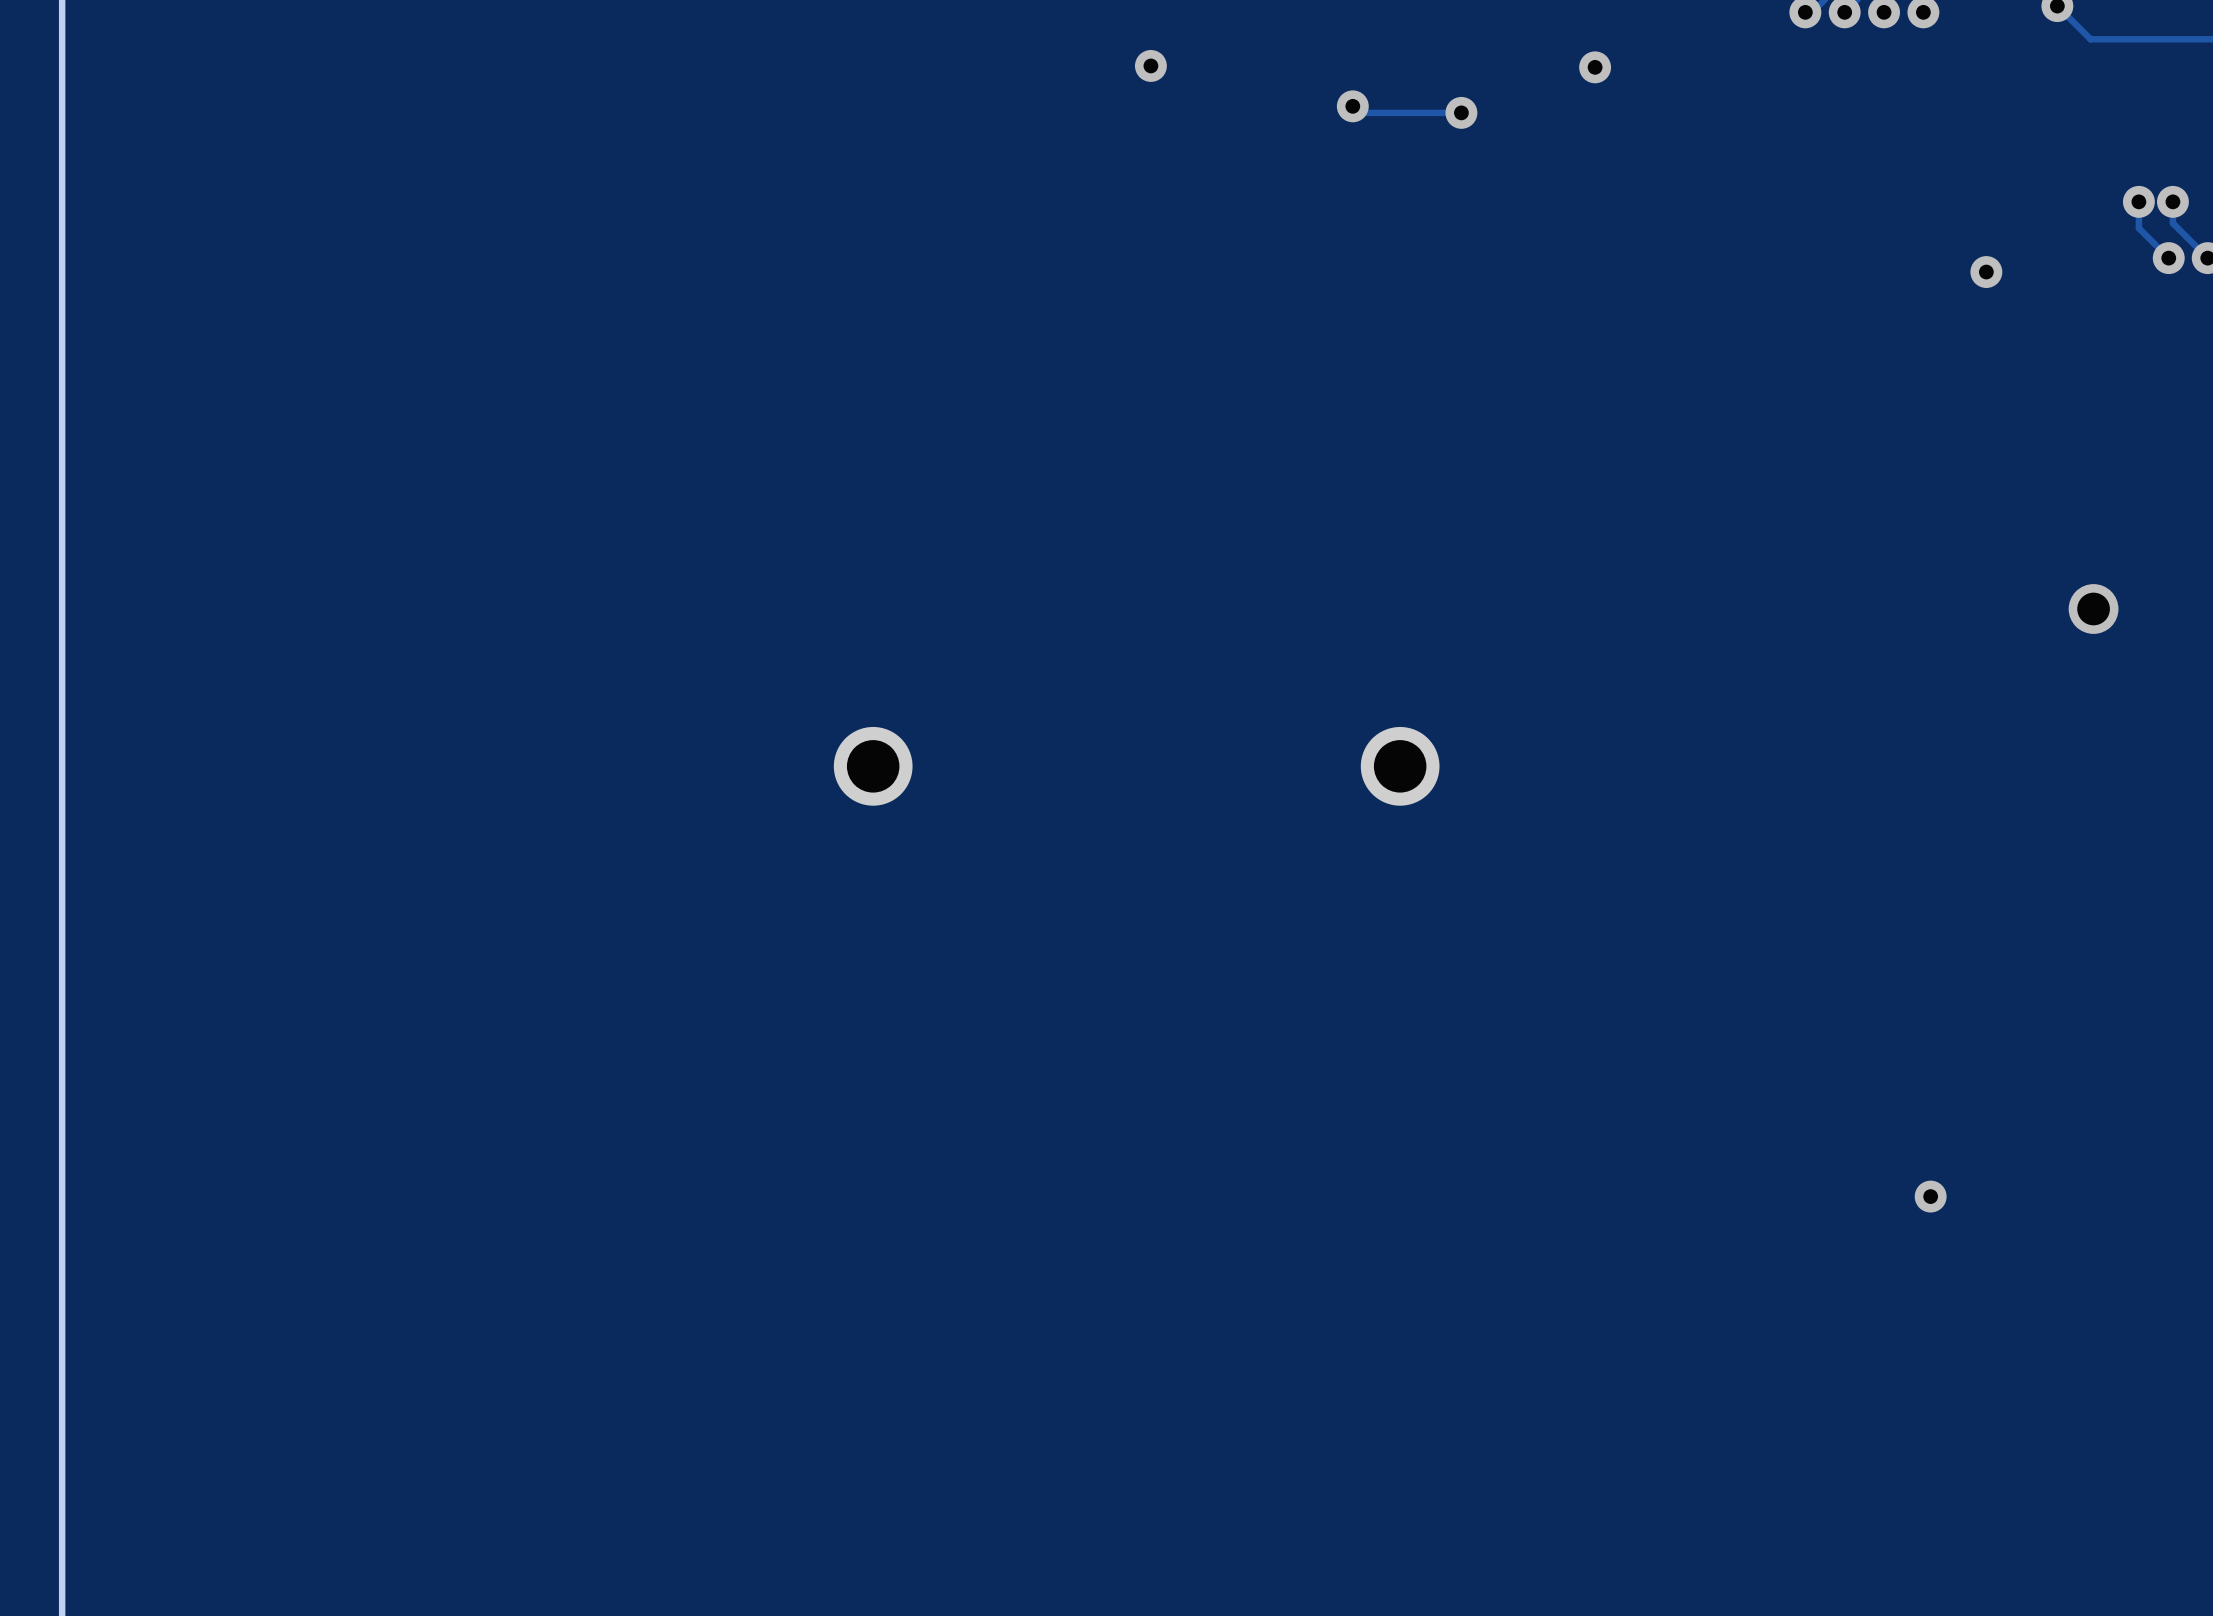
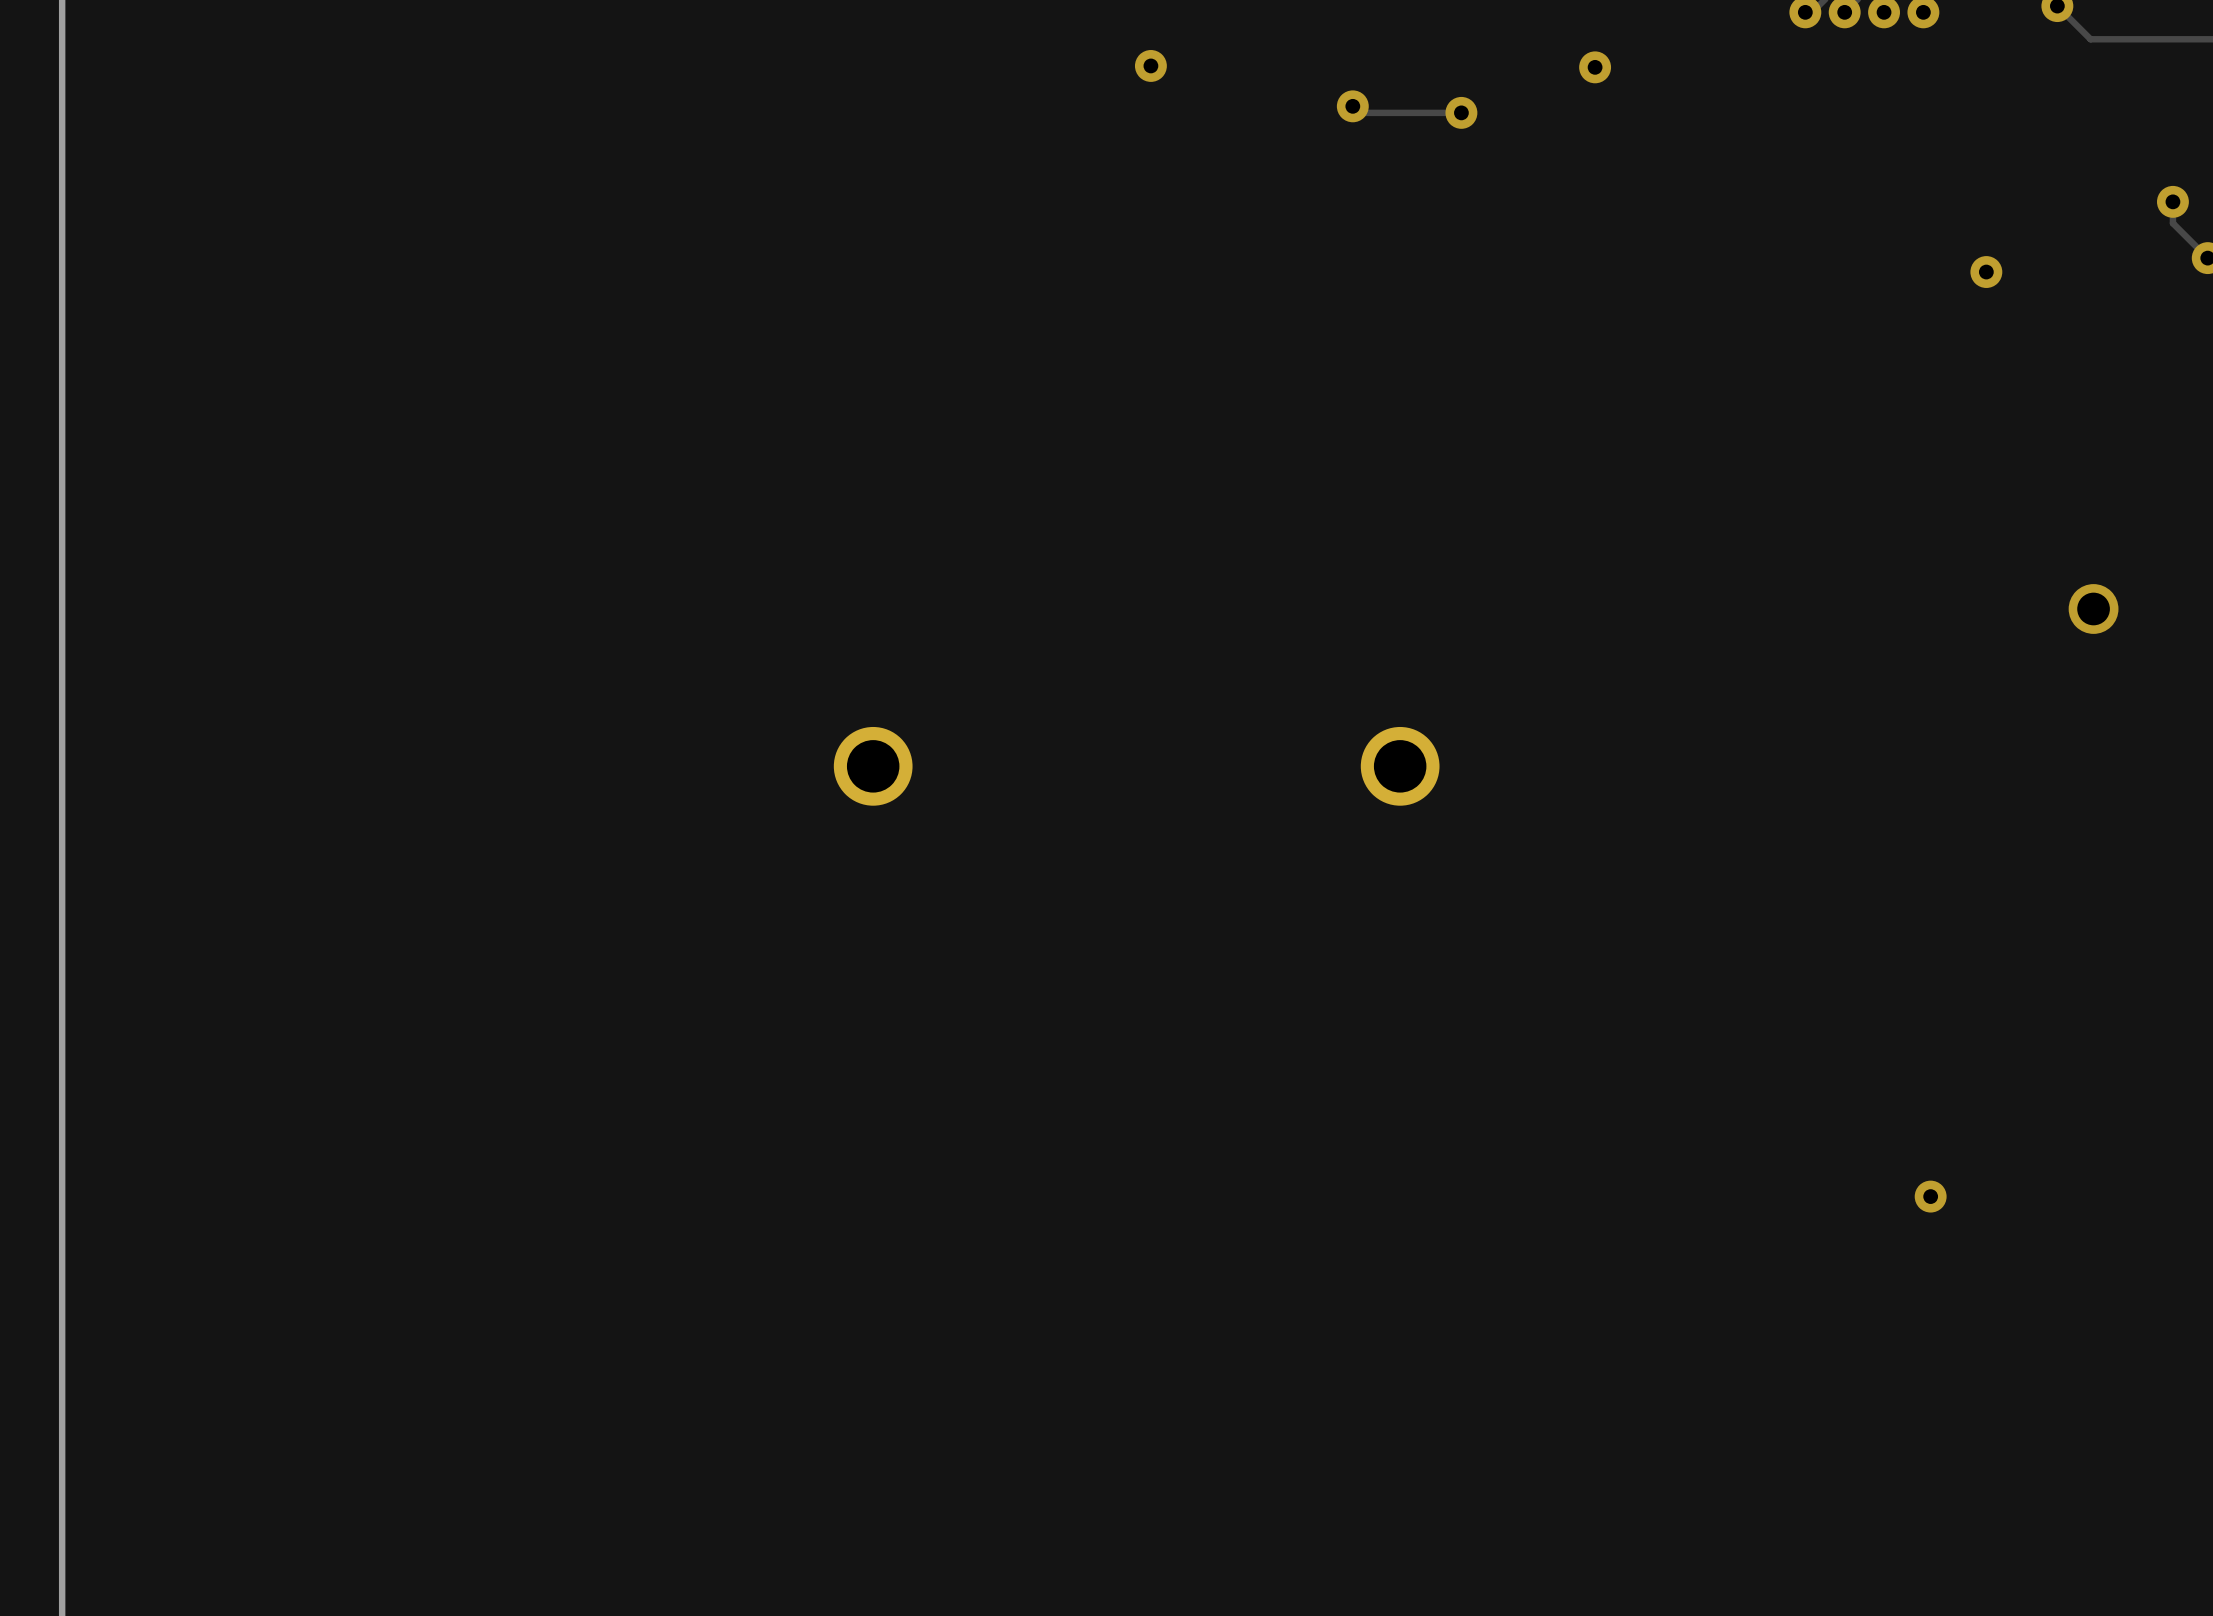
track: (2138, 201) (2138, 228) (2168, 258) -> none
via: (2138, 201) -> none
via: (2168, 258) -> none

